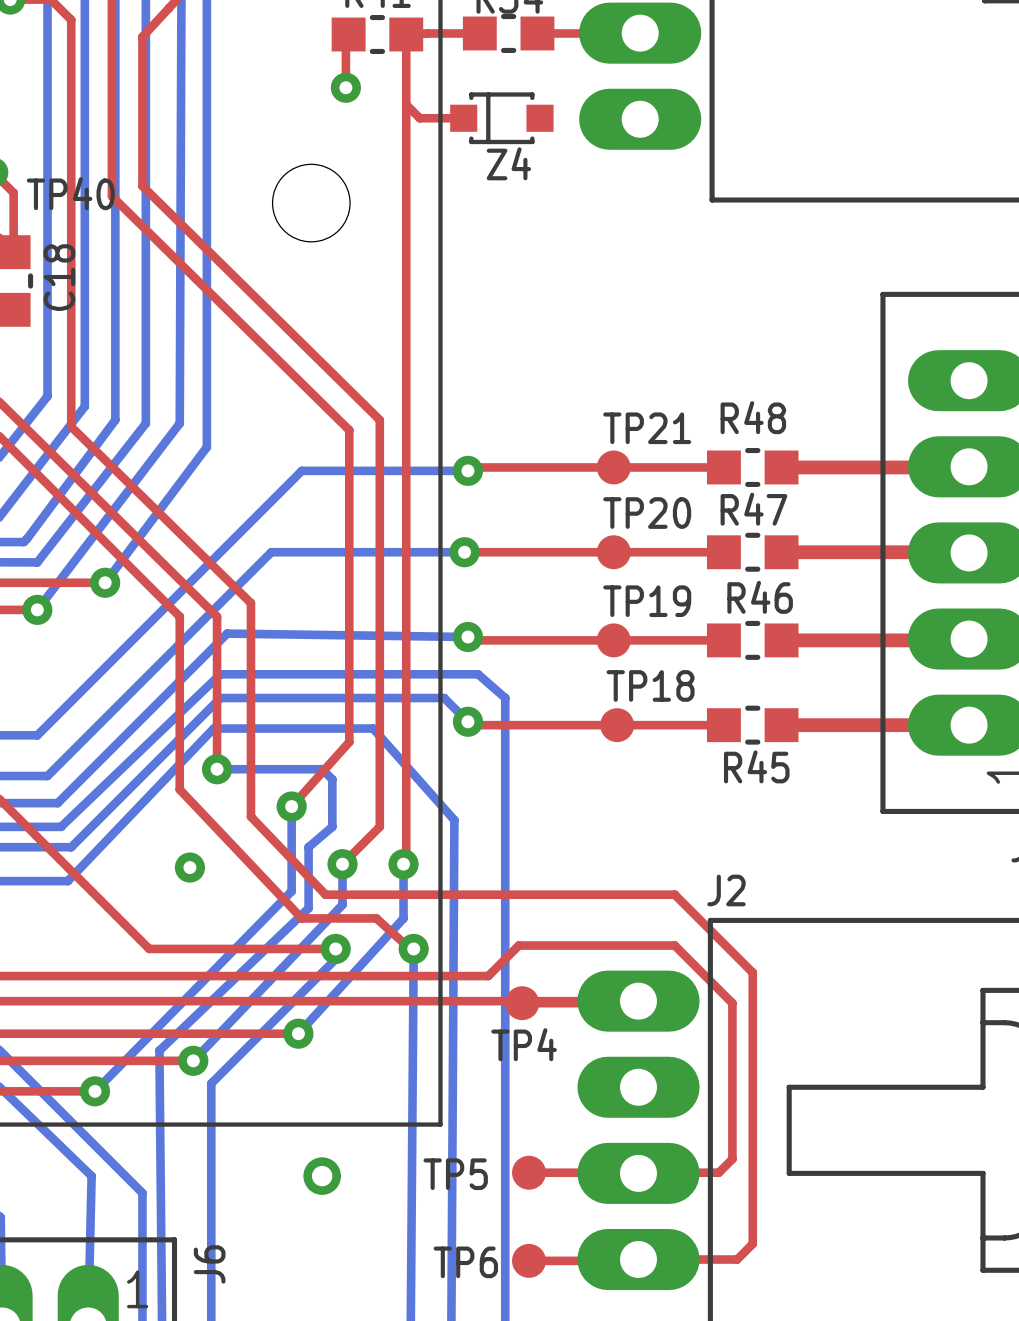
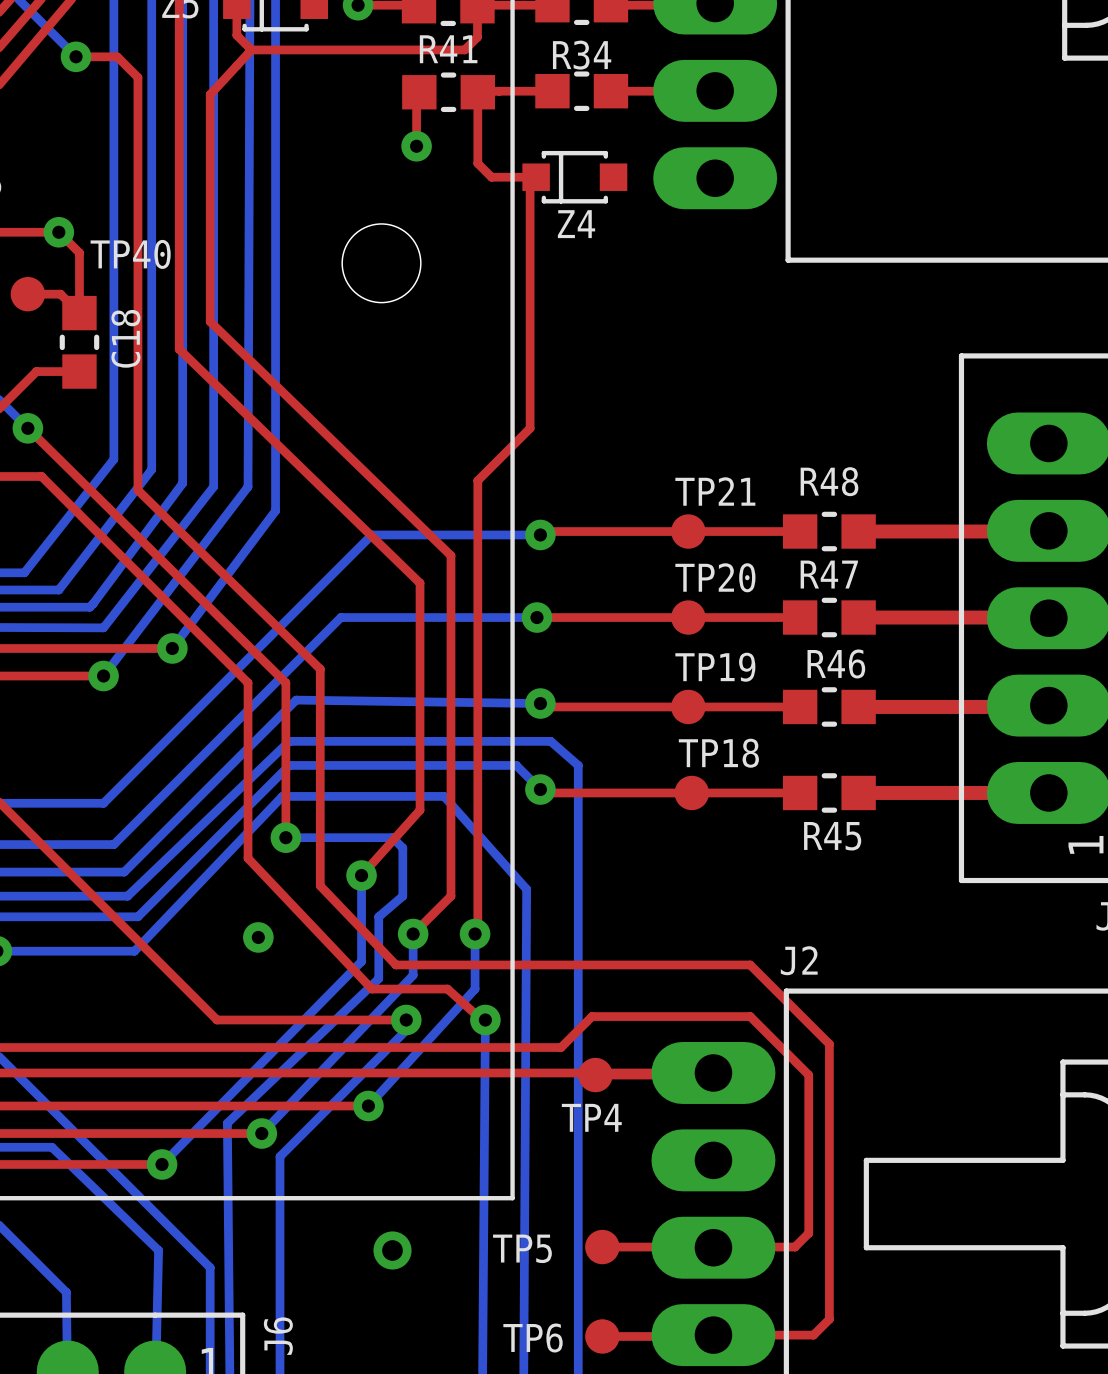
top track: (406, 104) (406, 417) -> (536, 177) (530, 183) (530, 428) (477, 480)
top track: (142, 186) (379, 420) (379, 491) -> (210, 246) (210, 321) (450, 555)
top track: (111, 196) (349, 430) (349, 518) -> (179, 256) (179, 349) (420, 583)

